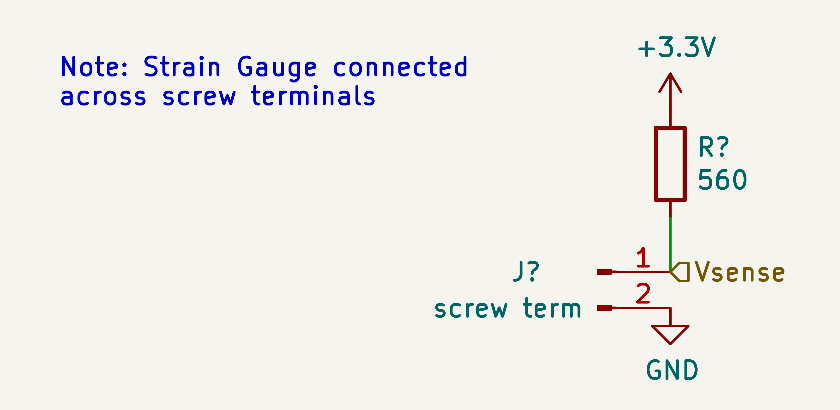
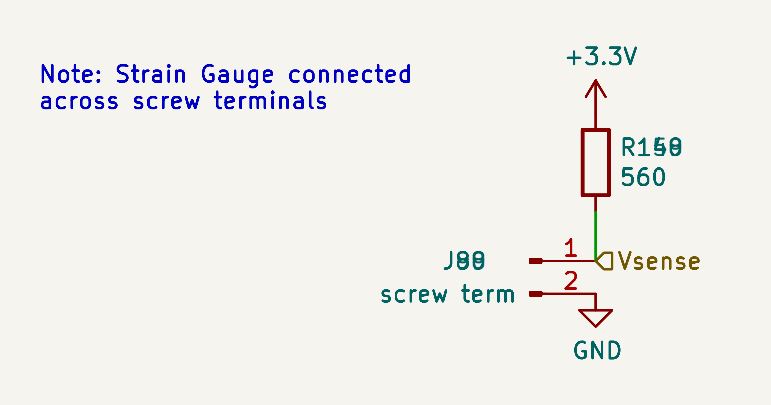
R?: 560 (670, 163) -> none
part: none -> 560 (595, 162)
part: none -> 560 (595, 162)
part: none -> 560 (595, 162)
J?: screw term (633, 289) -> none
part: none -> screw term (562, 277)
part: none -> screw term (562, 277)
part: none -> screw term (562, 277)

